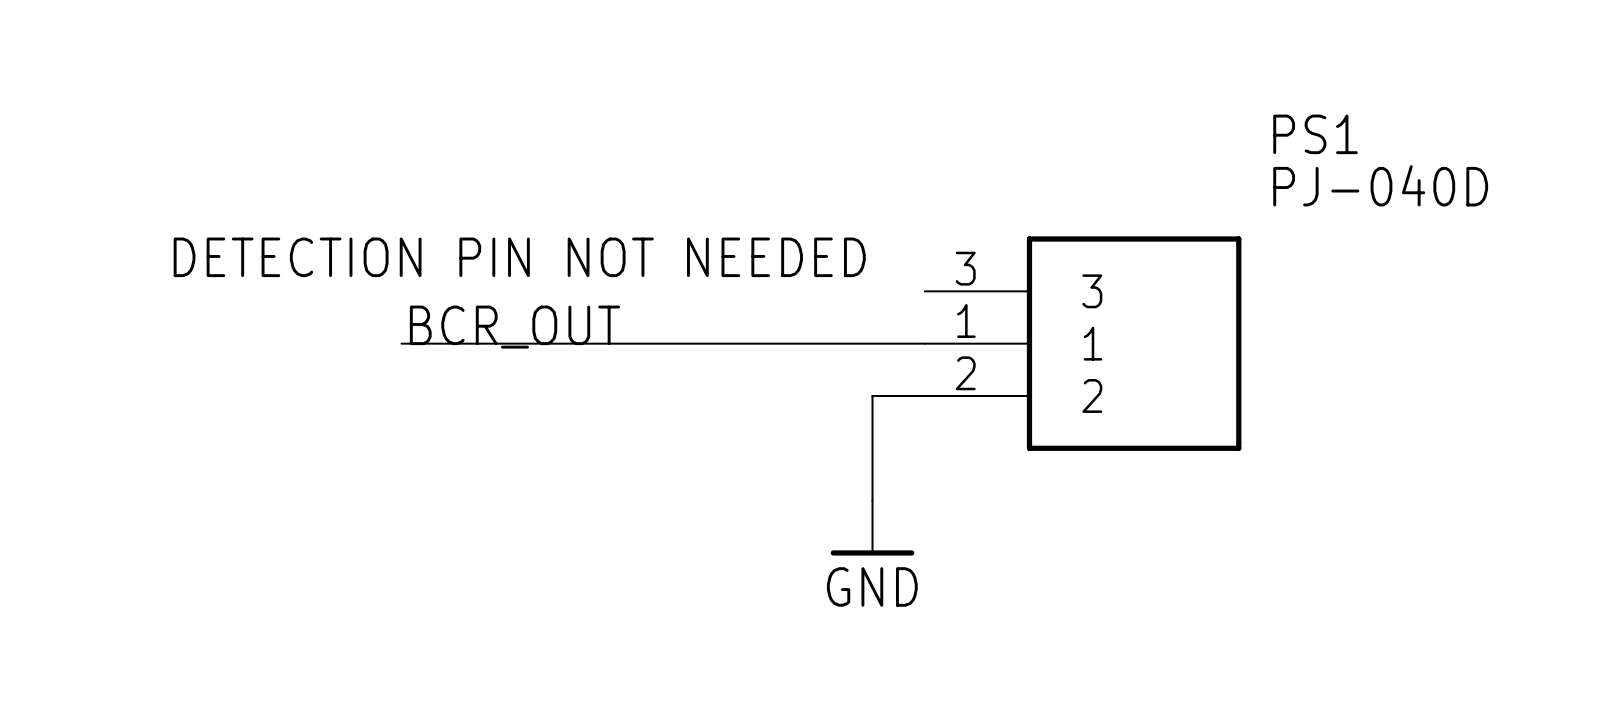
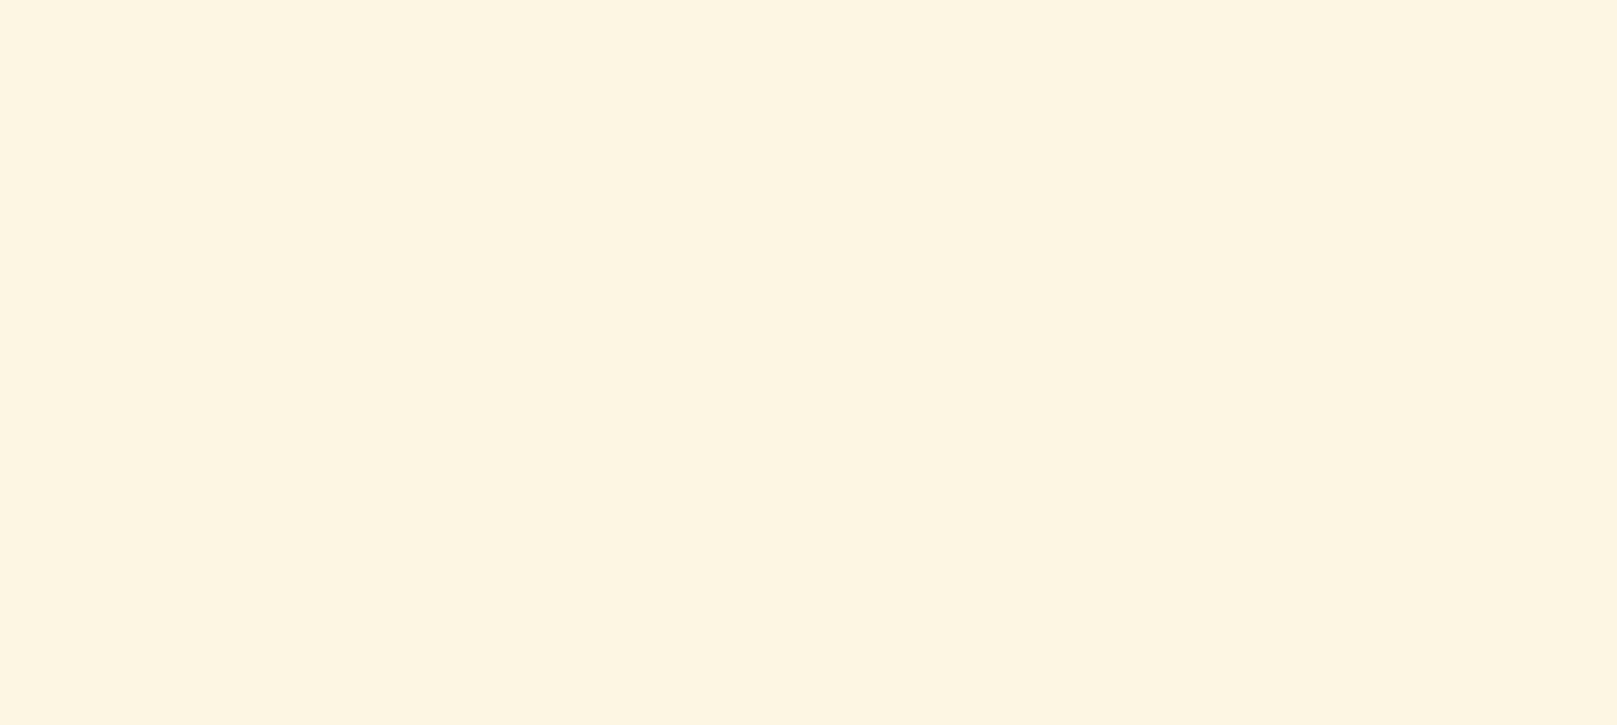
text: DETECTION PIN NOT NEEDED (519, 257) -> none
label: BCR_OUT (514, 327) -> none
wire: (401, 343) (924, 343) -> none
PS1: PJ-040D (1083, 343) -> none
wire: (924, 395) (872, 395) (872, 500) -> none
power symbol: GND (872, 528) -> none

